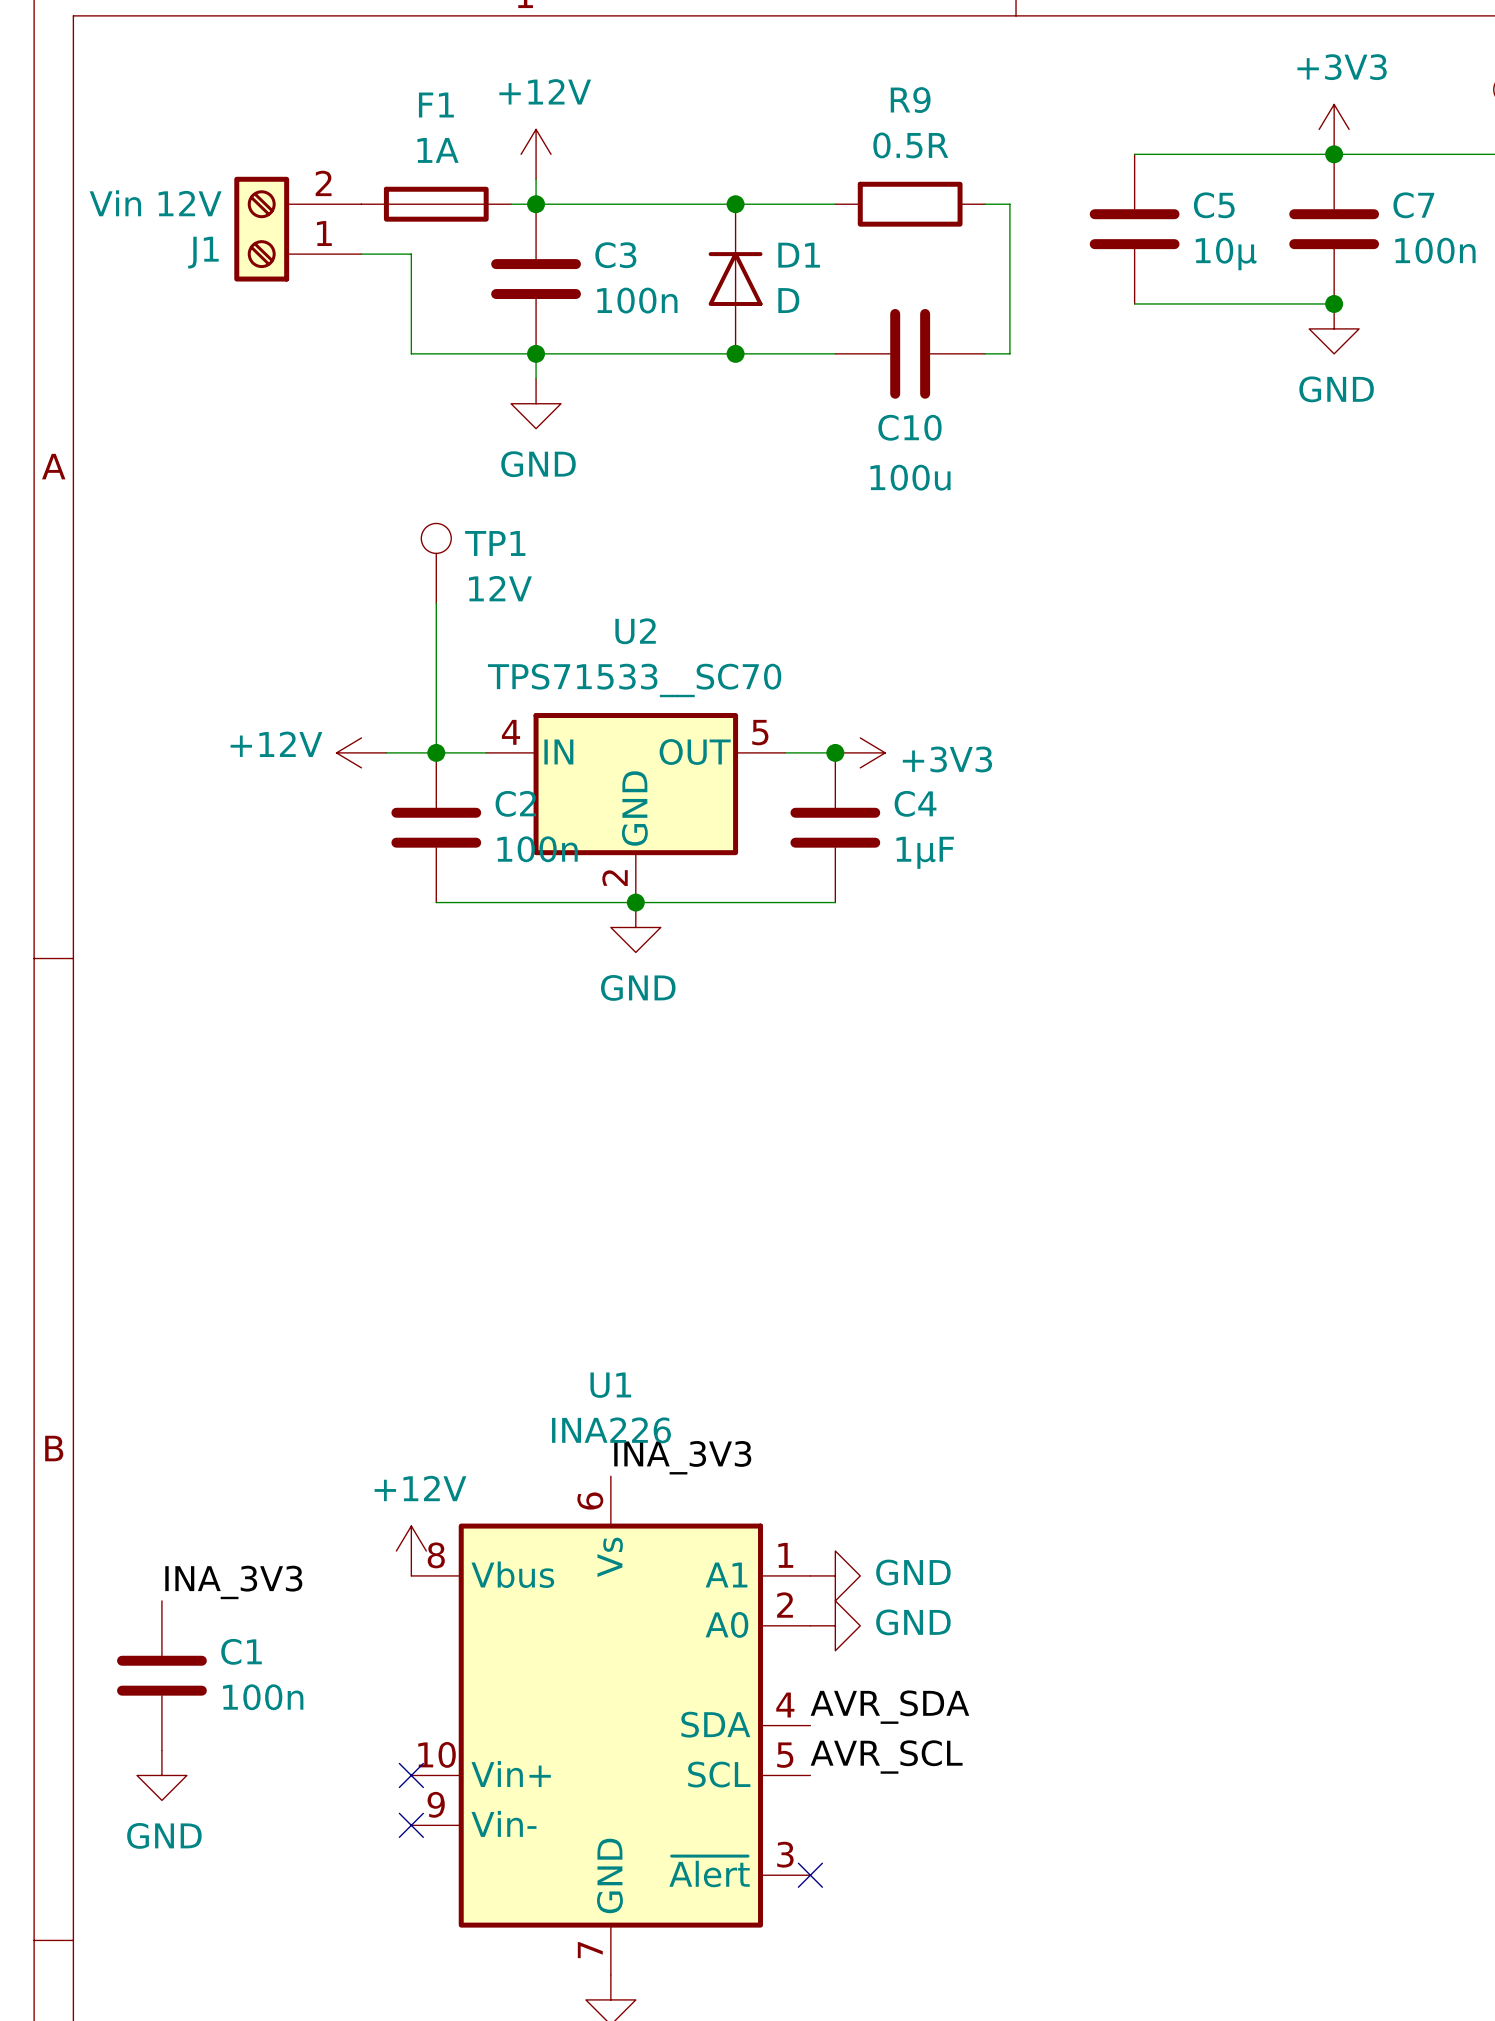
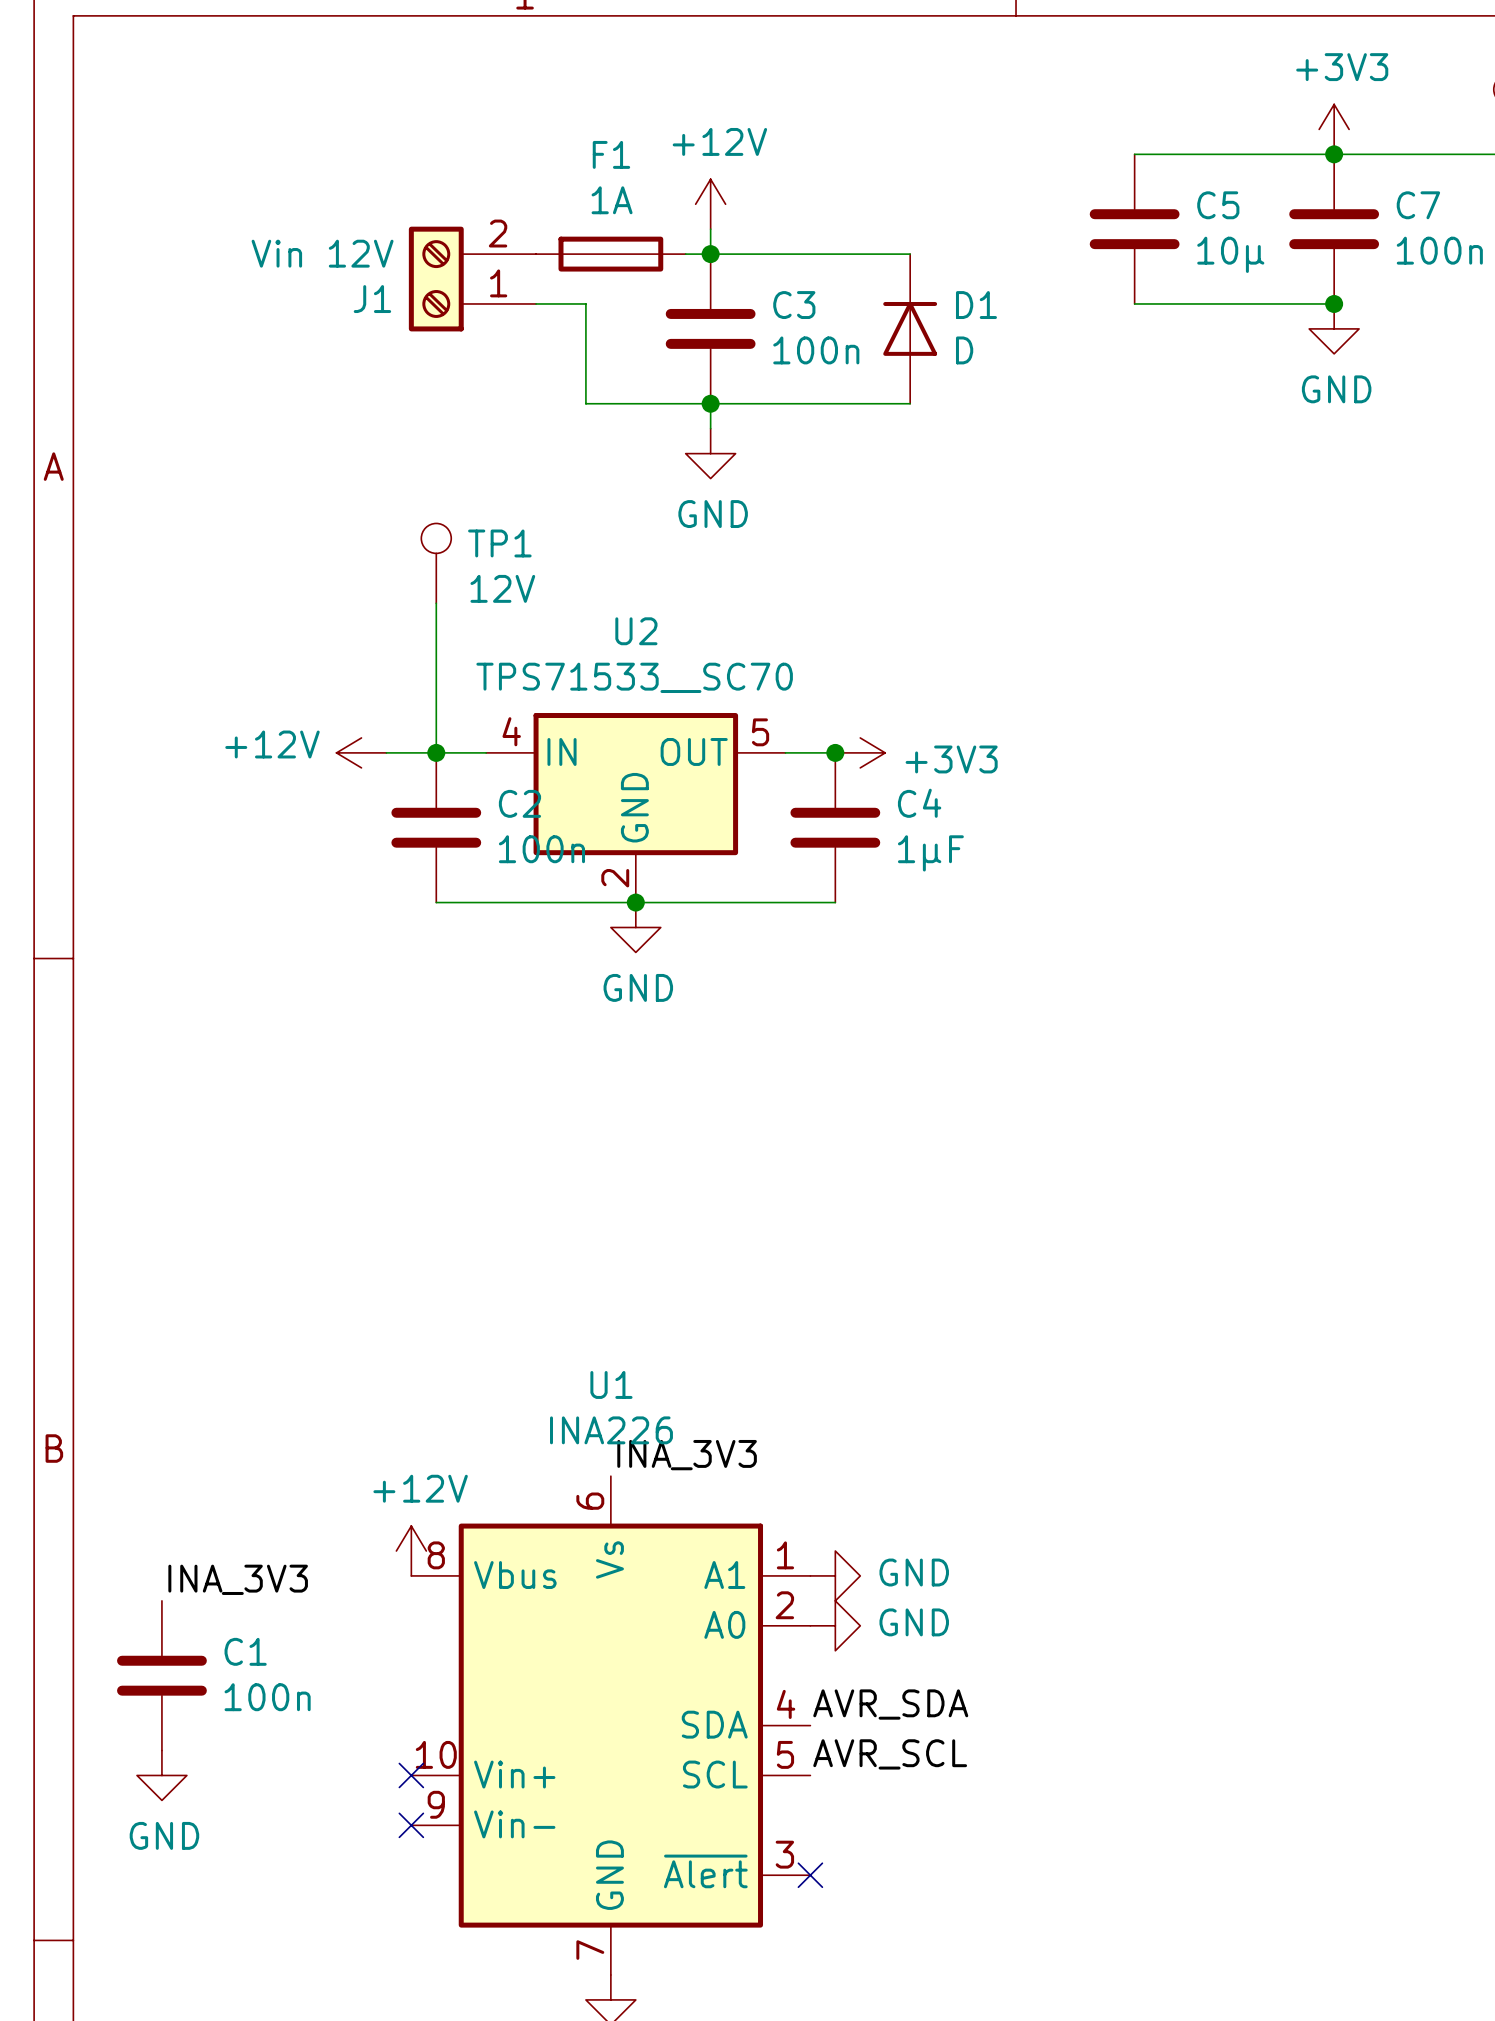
power symbol position: +12V (536, 154) -> +12V (710, 204)
wire: (536, 179) (536, 204) -> (710, 229) (710, 254)
F1 position: (436, 204) -> (610, 254)
wire: (511, 204) (835, 204) -> none
junction: (536, 204) -> none
junction: (735, 204) -> none
R9: 0.5R (910, 204) -> none
wire: (984, 204) (1009, 204) (1009, 353) (984, 353) -> none
J1 position: (297, 229) -> (472, 279)
wire: (361, 254) (411, 254) (411, 353) (835, 353) -> none
wire: none -> (685, 254) (910, 254)
junction: none -> (710, 254)
C3 position: (536, 279) -> (710, 328)
D1 position: (735, 279) -> (910, 328)
wire: none -> (536, 303) (585, 303) (585, 403) (910, 403)
wire: (536, 353) (536, 378) -> (710, 403) (710, 428)
junction: (536, 353) -> none
junction: (735, 353) -> none
C10: 100u (910, 353) -> none
power symbol position: GND (536, 403) -> GND (710, 453)
junction: none -> (710, 403)

